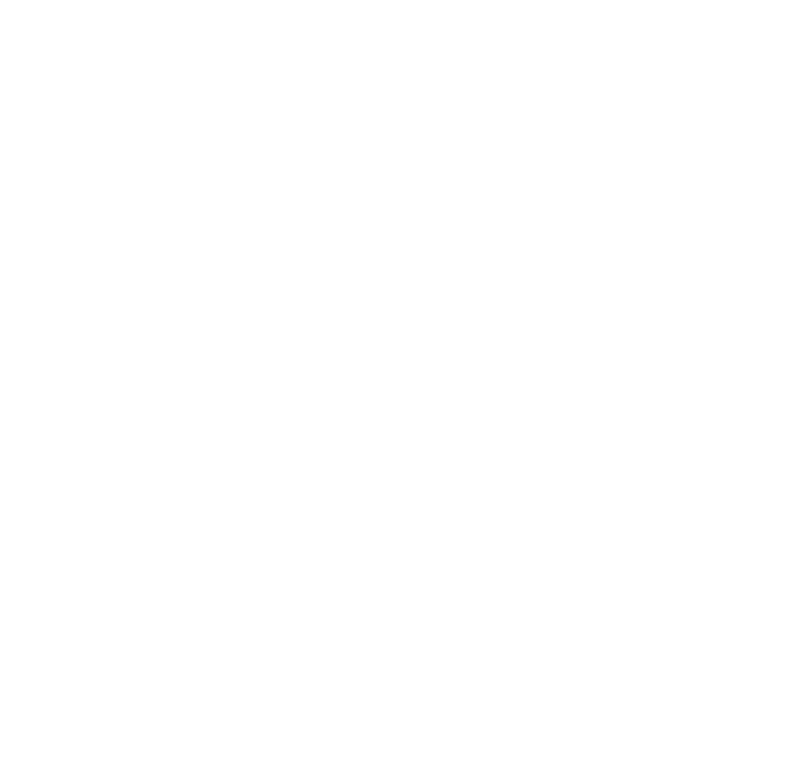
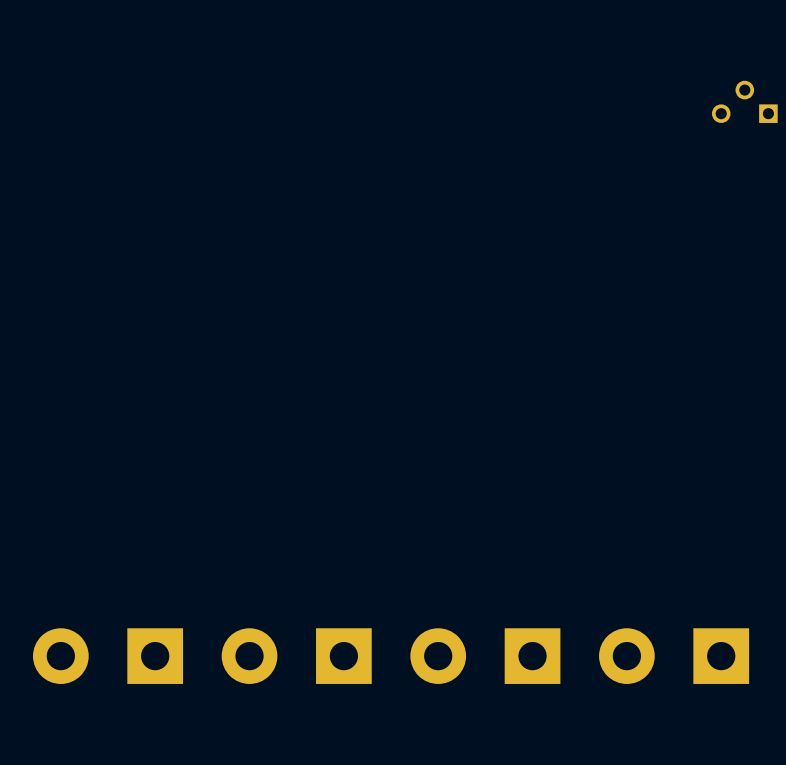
part: none -> (744, 101)
part: none -> (108, 656)
part: none -> (296, 656)
part: none -> (485, 656)
part: none -> (674, 656)

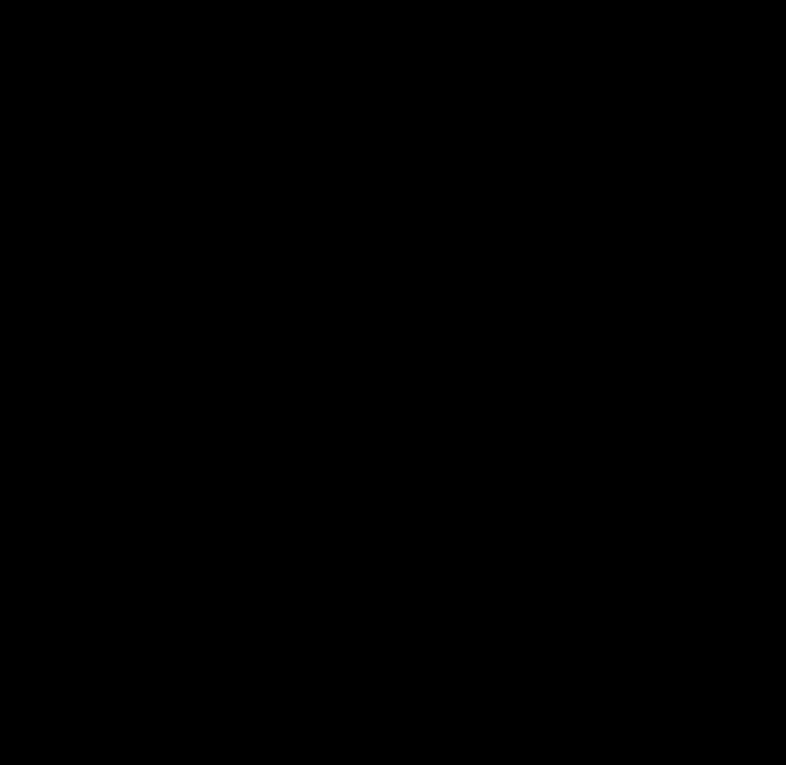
part: (744, 101) -> none
part: (108, 656) -> none
part: (296, 656) -> none
part: (485, 656) -> none
part: (674, 656) -> none

